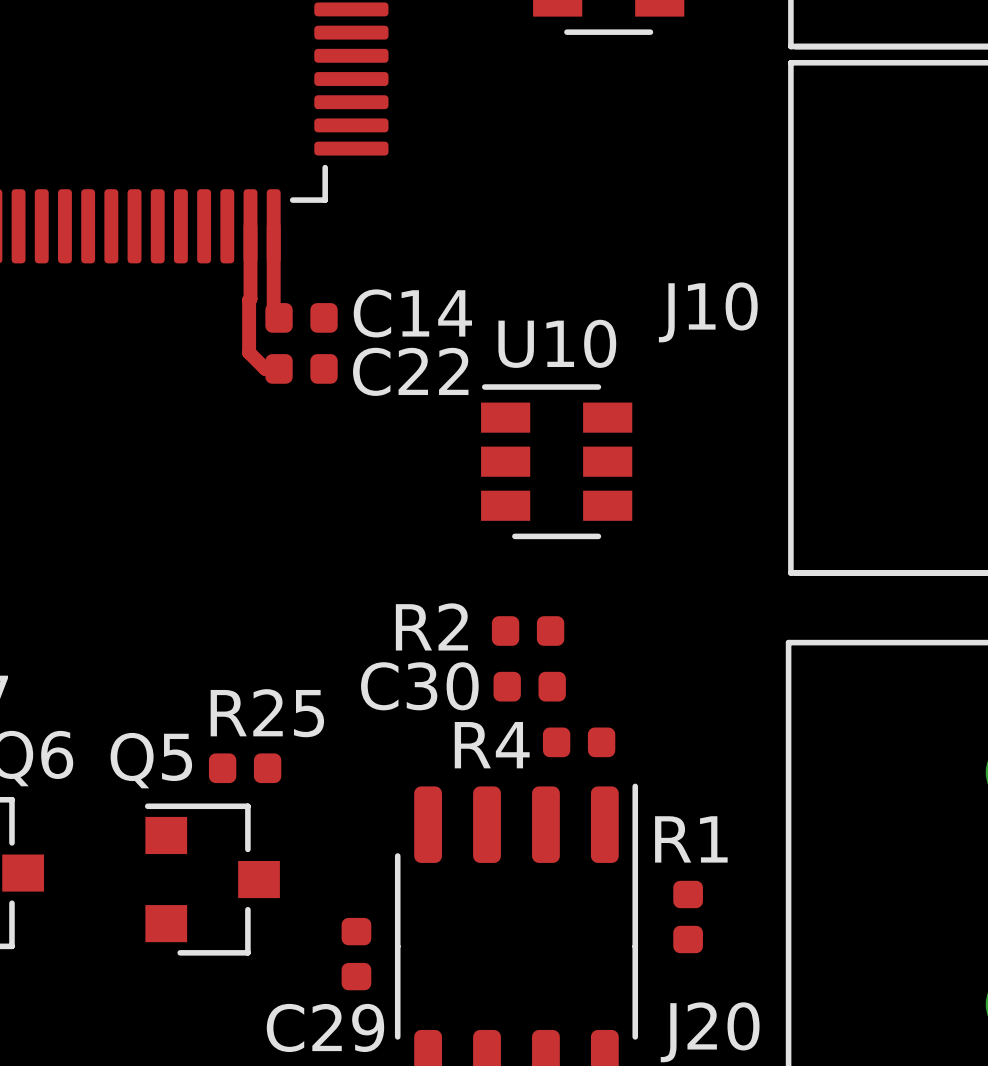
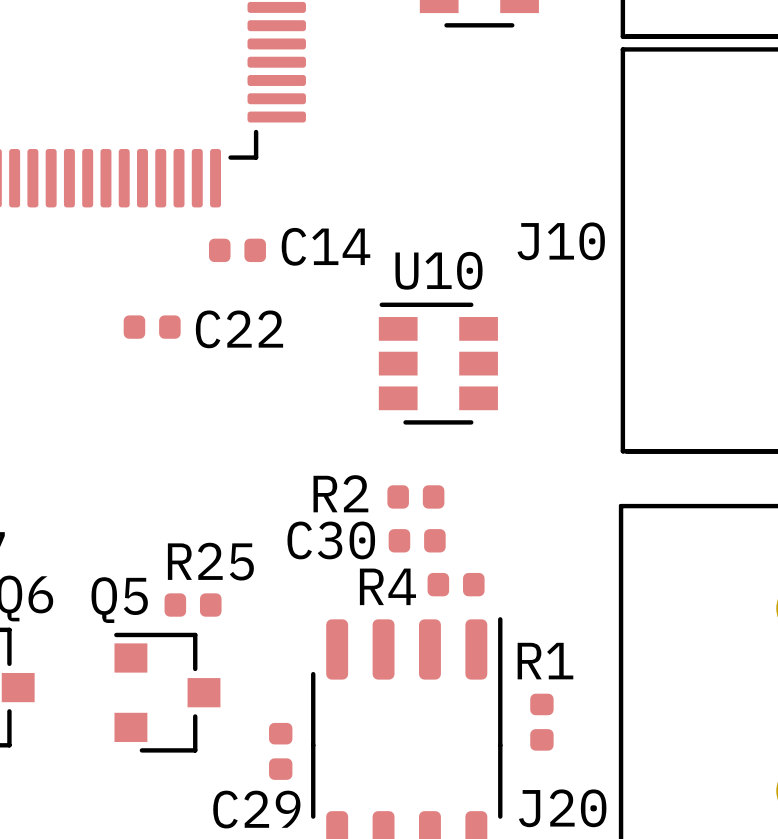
track: (250, 226) (249, 352) (265, 368) (279, 368) -> none
track: (273, 226) (273, 312) (279, 317) -> none
C22 position: (301, 368) -> (152, 327)

